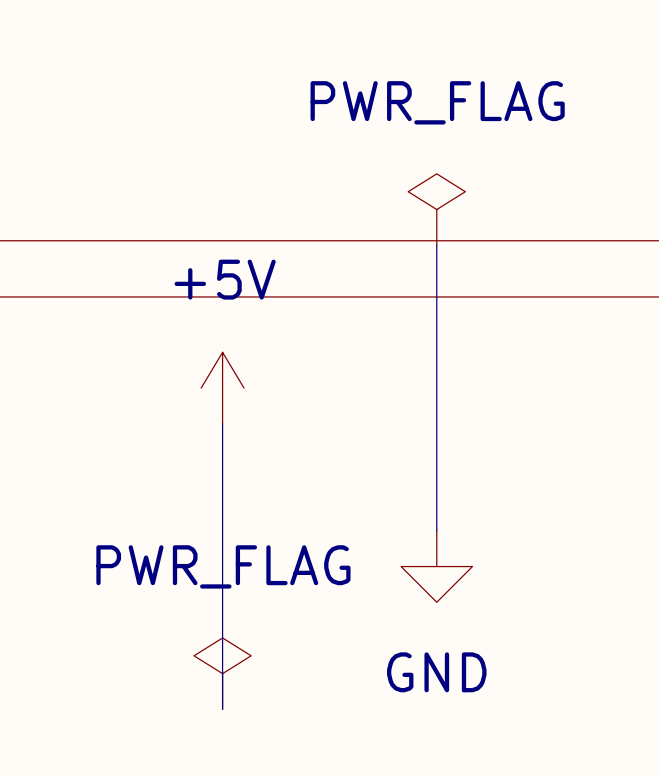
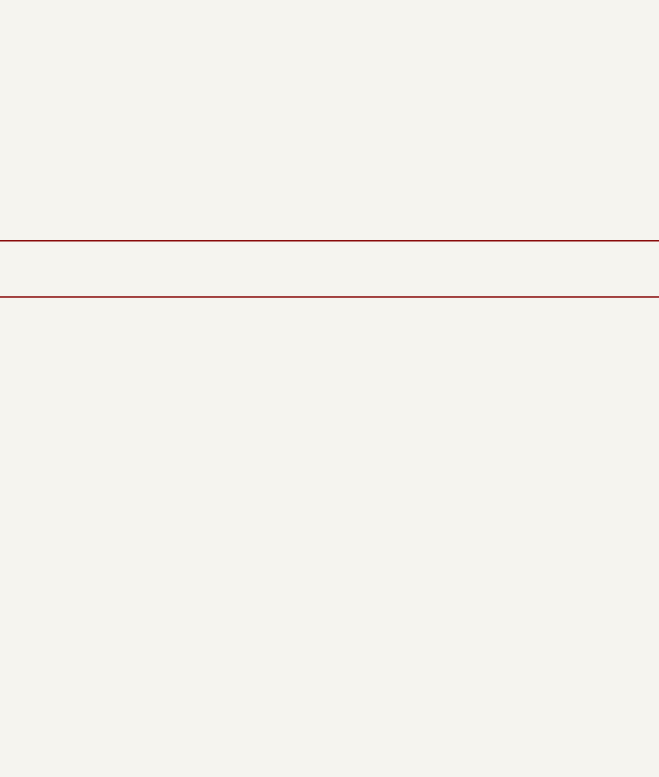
power symbol: PWR_FLAG (436, 209) -> none
wire: (436, 245) (436, 530) -> none
power symbol: +5V (222, 388) -> none
wire: (222, 423) (222, 709) -> none
power symbol: GND (436, 566) -> none
power symbol: PWR_FLAG (222, 673) -> none

